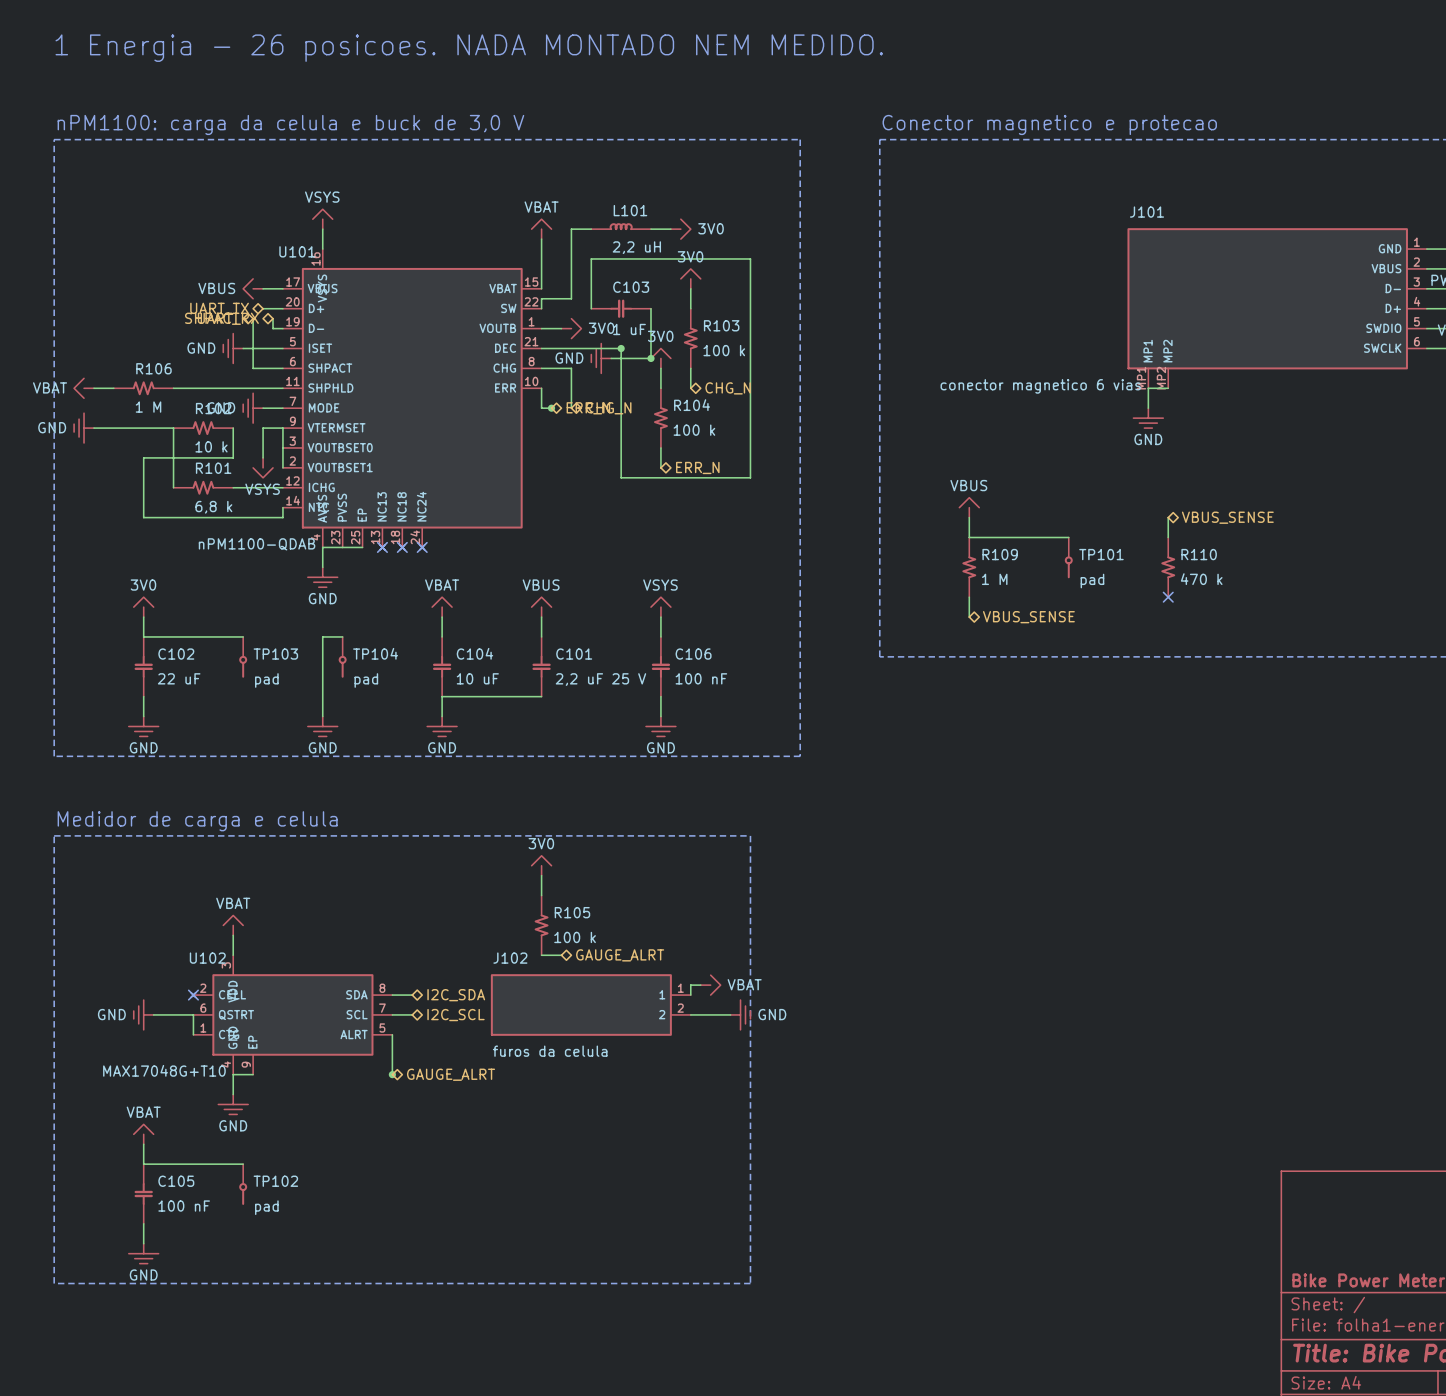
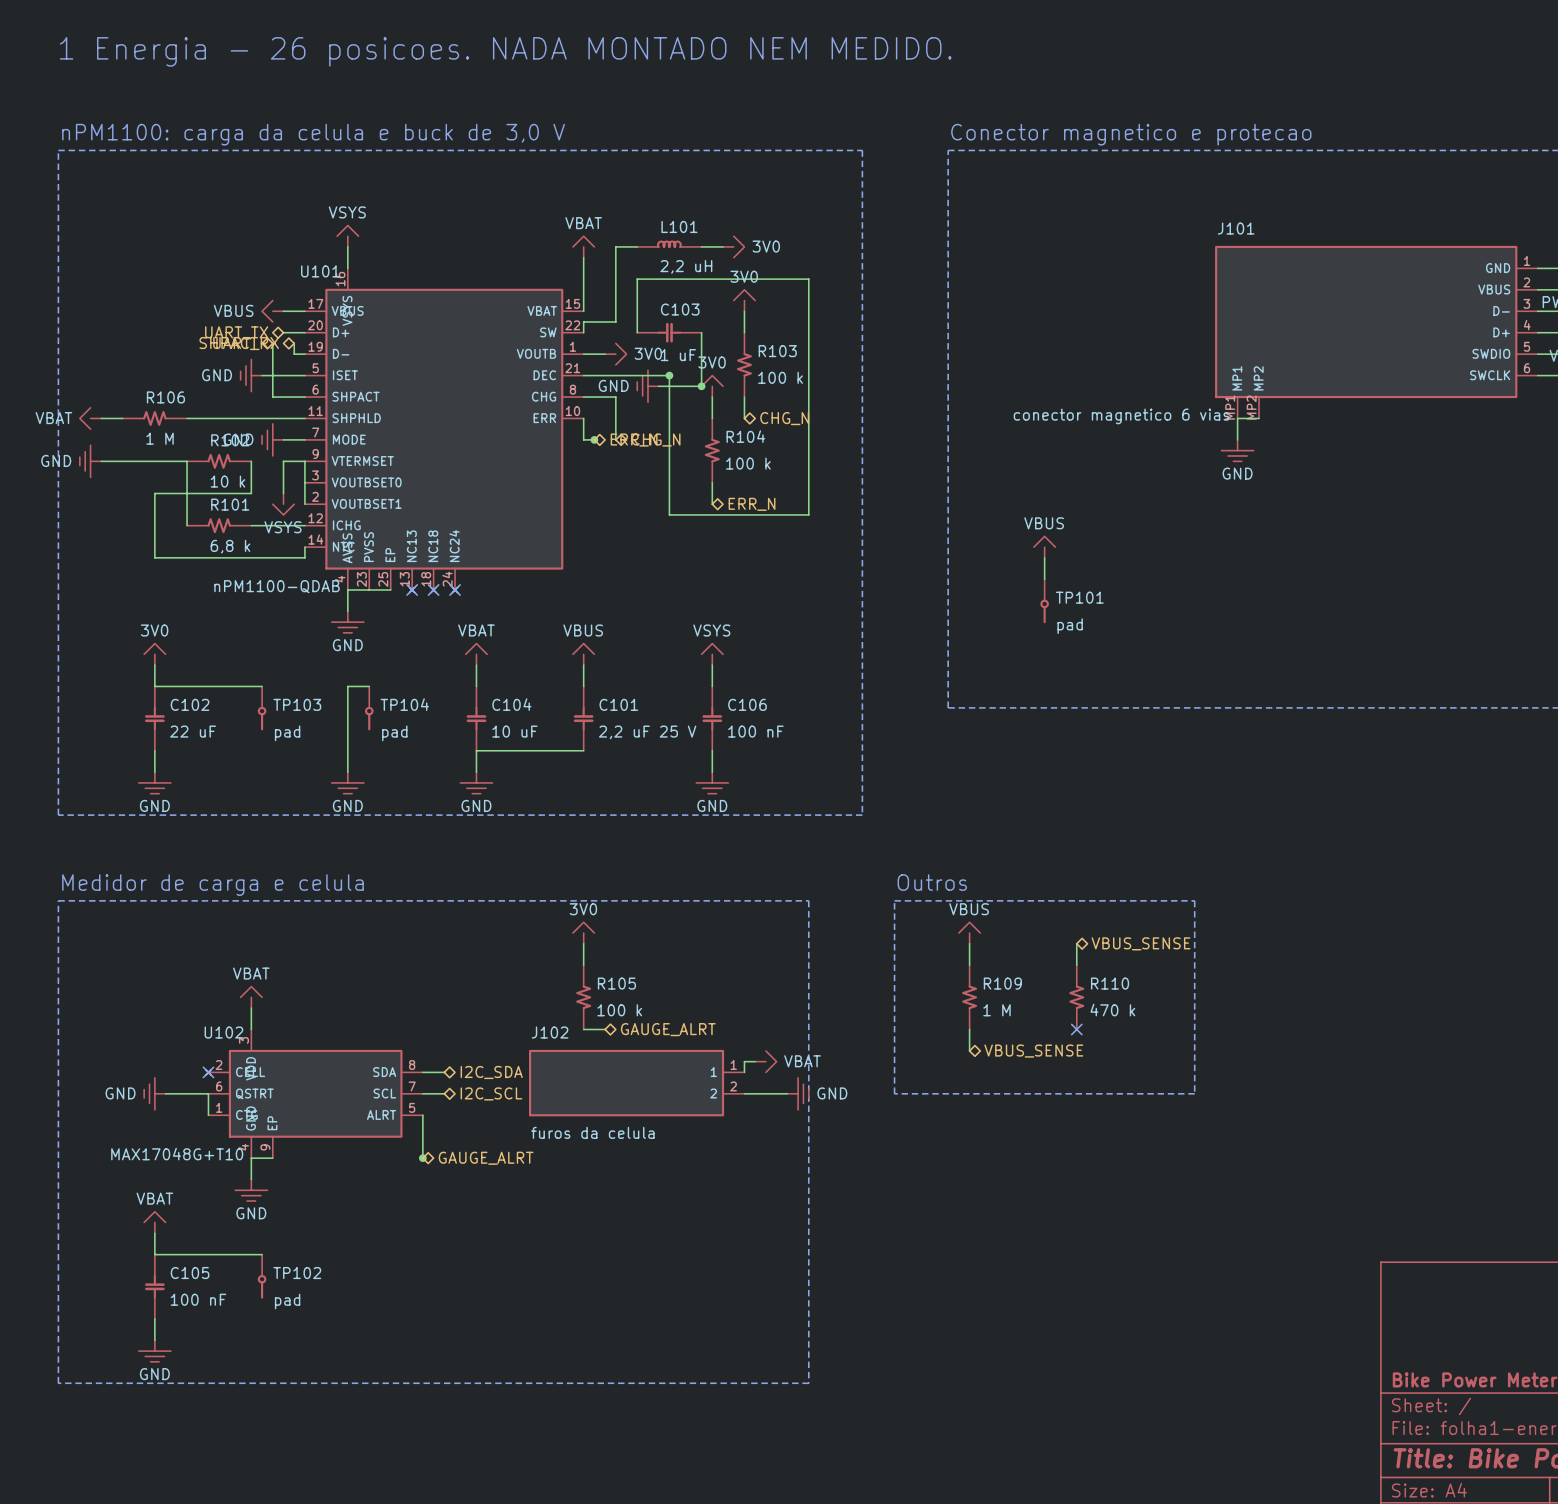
wire: (1168, 517) (1168, 537) -> none
hierarchical label: VBUS_SENSE (1227, 517) -> none
wire: (969, 537) (1068, 537) -> none
TP101 position: (1068, 557) -> (1044, 601)
R109 position: (969, 567) -> (969, 997)
R110 position: (1168, 567) -> (1076, 997)
wire: (969, 597) (969, 617) -> none
no-connect mark: (1168, 597) -> none
hierarchical label: VBUS_SENSE (1028, 617) -> none
text: none -> Outros (932, 882)
line: none -> (894, 900) (1194, 900) (1194, 1093) (894, 1093) (894, 900)
power symbol: none -> VBUS (969, 933)
wire: none -> (969, 943) (969, 965)
wire: none -> (1076, 943) (1076, 965)
hierarchical label: none -> VBUS_SENSE (1141, 943)
wire: none -> (969, 1029) (969, 1050)
no-connect mark: none -> (1076, 1029)
hierarchical label: none -> VBUS_SENSE (1033, 1051)

